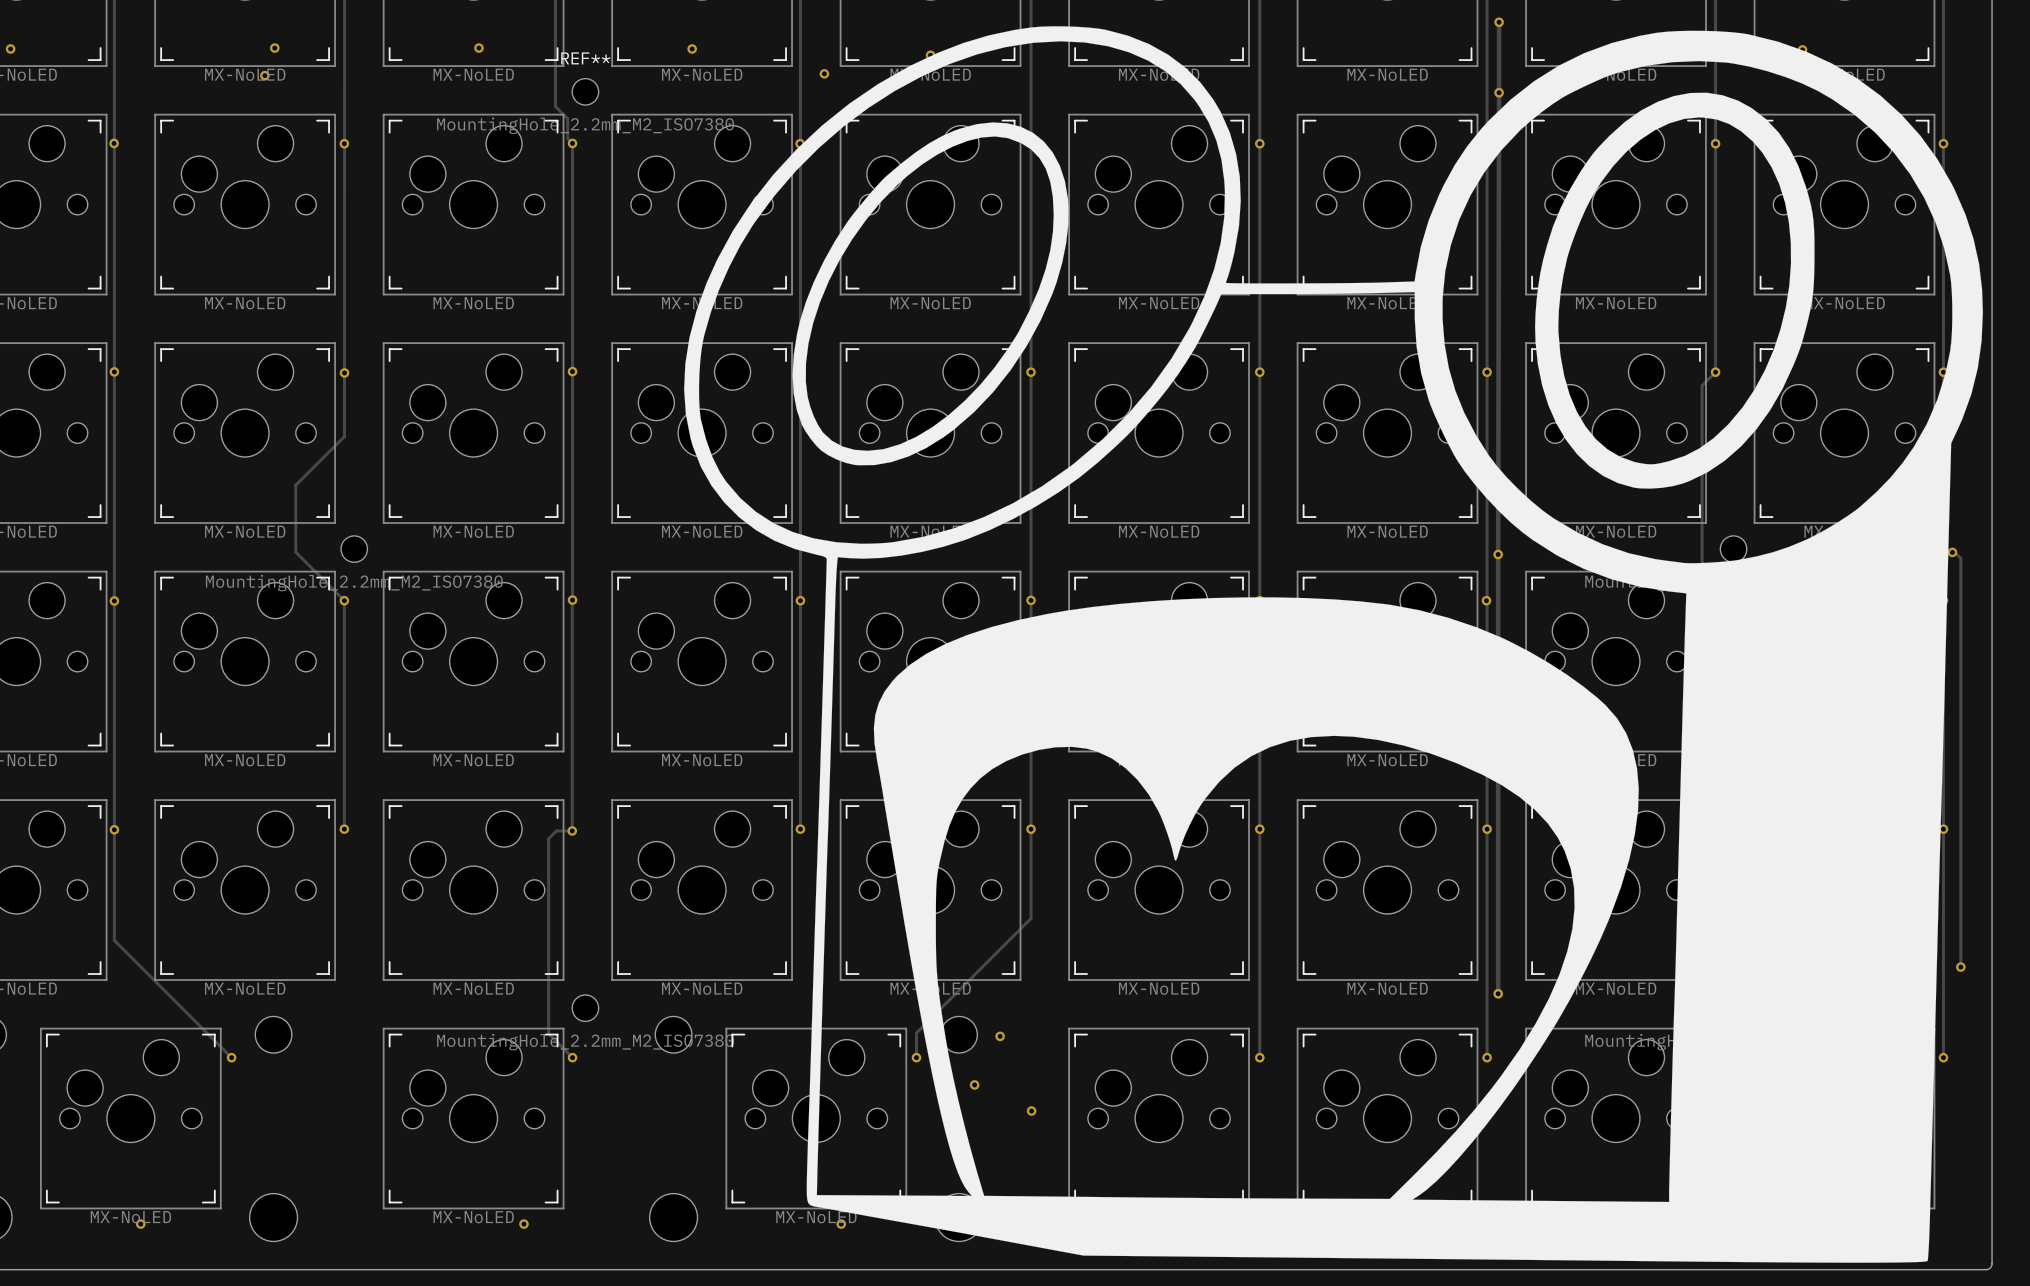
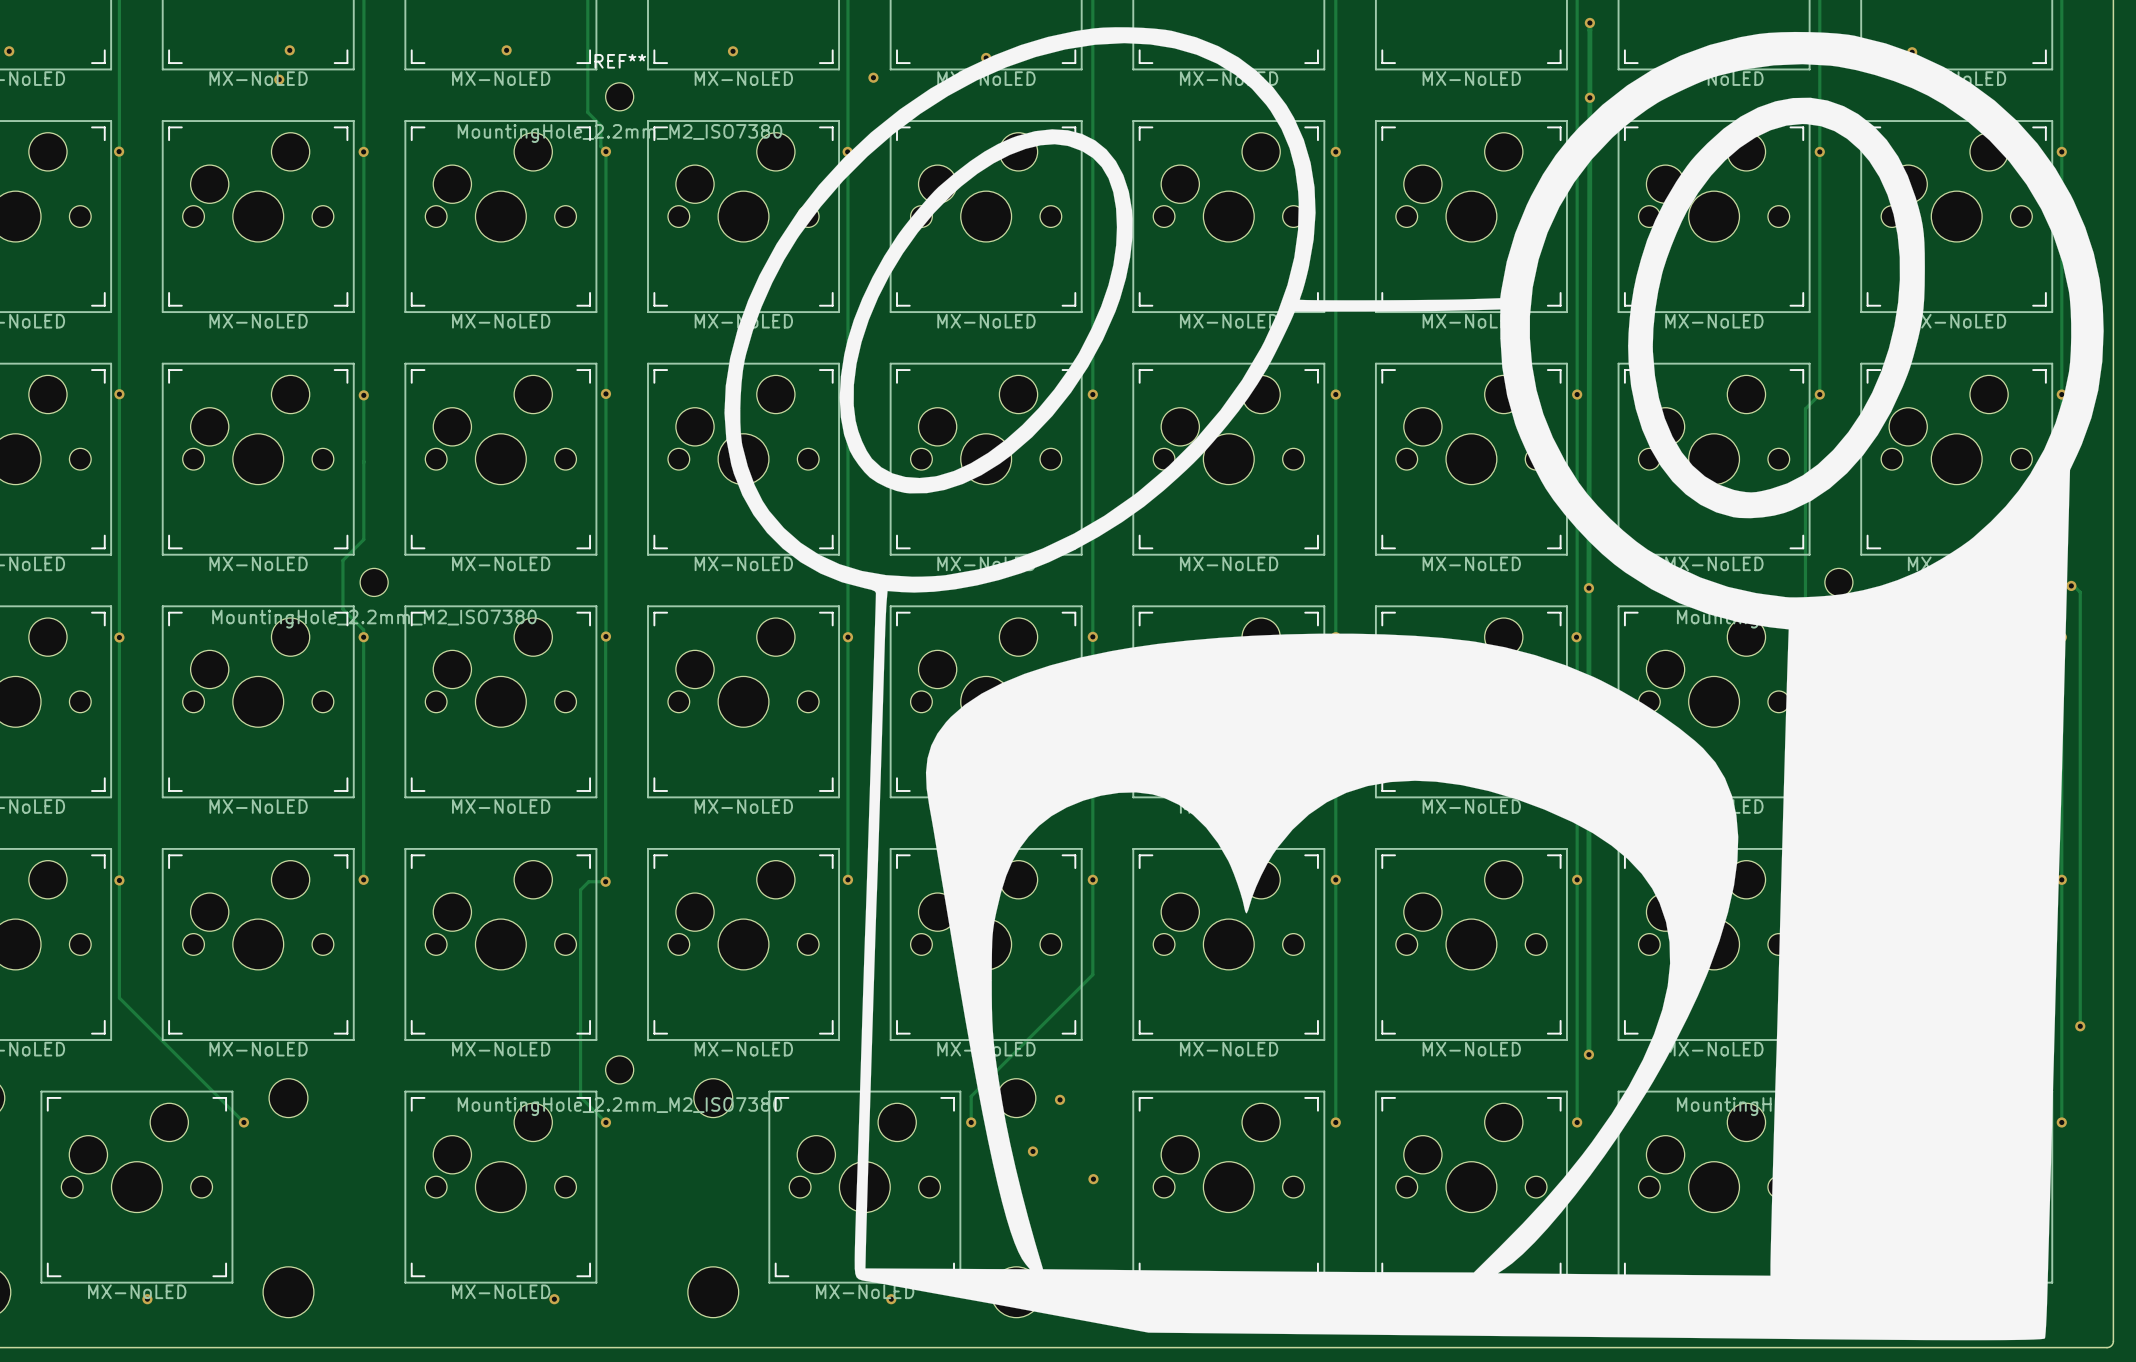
track: (344, 436) (295, 485) (295, 552) (344, 600) -> (363, 462) (363, 539) (342, 560) (342, 609) (363, 629) (363, 637)

